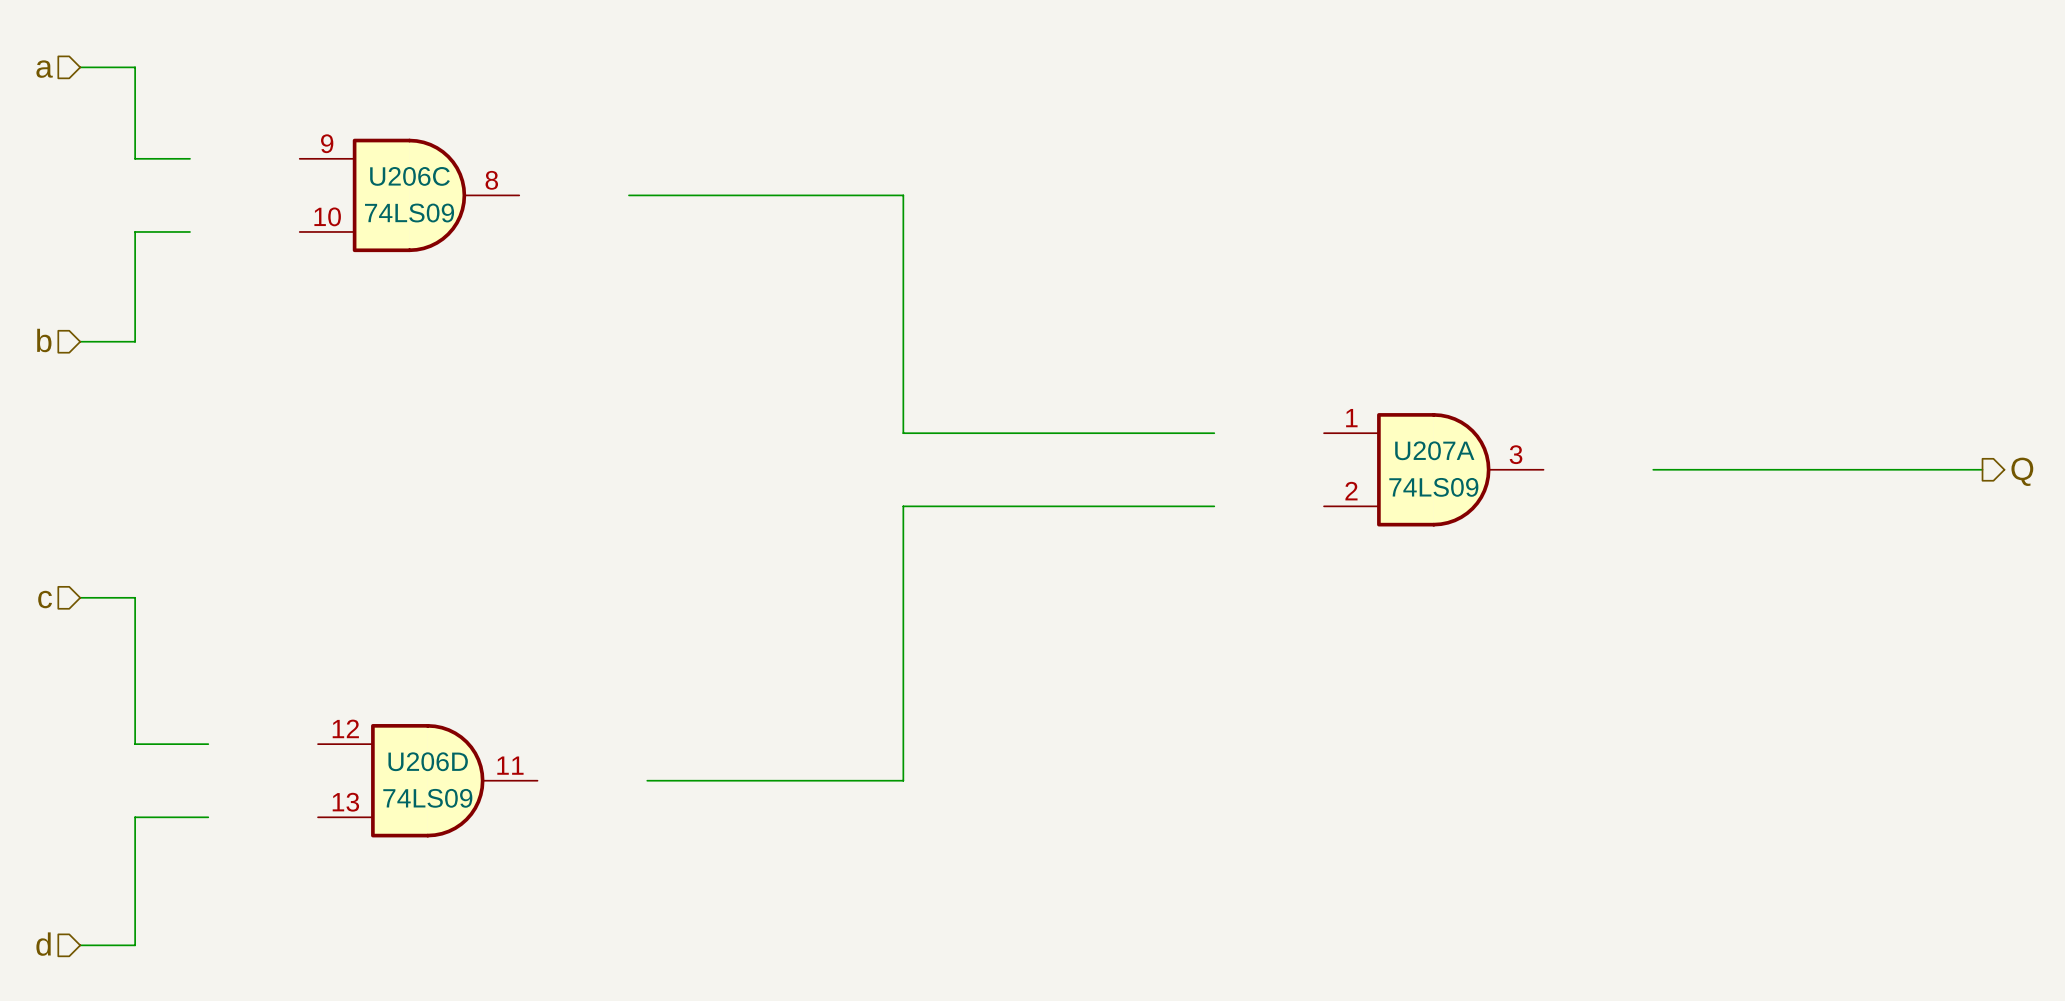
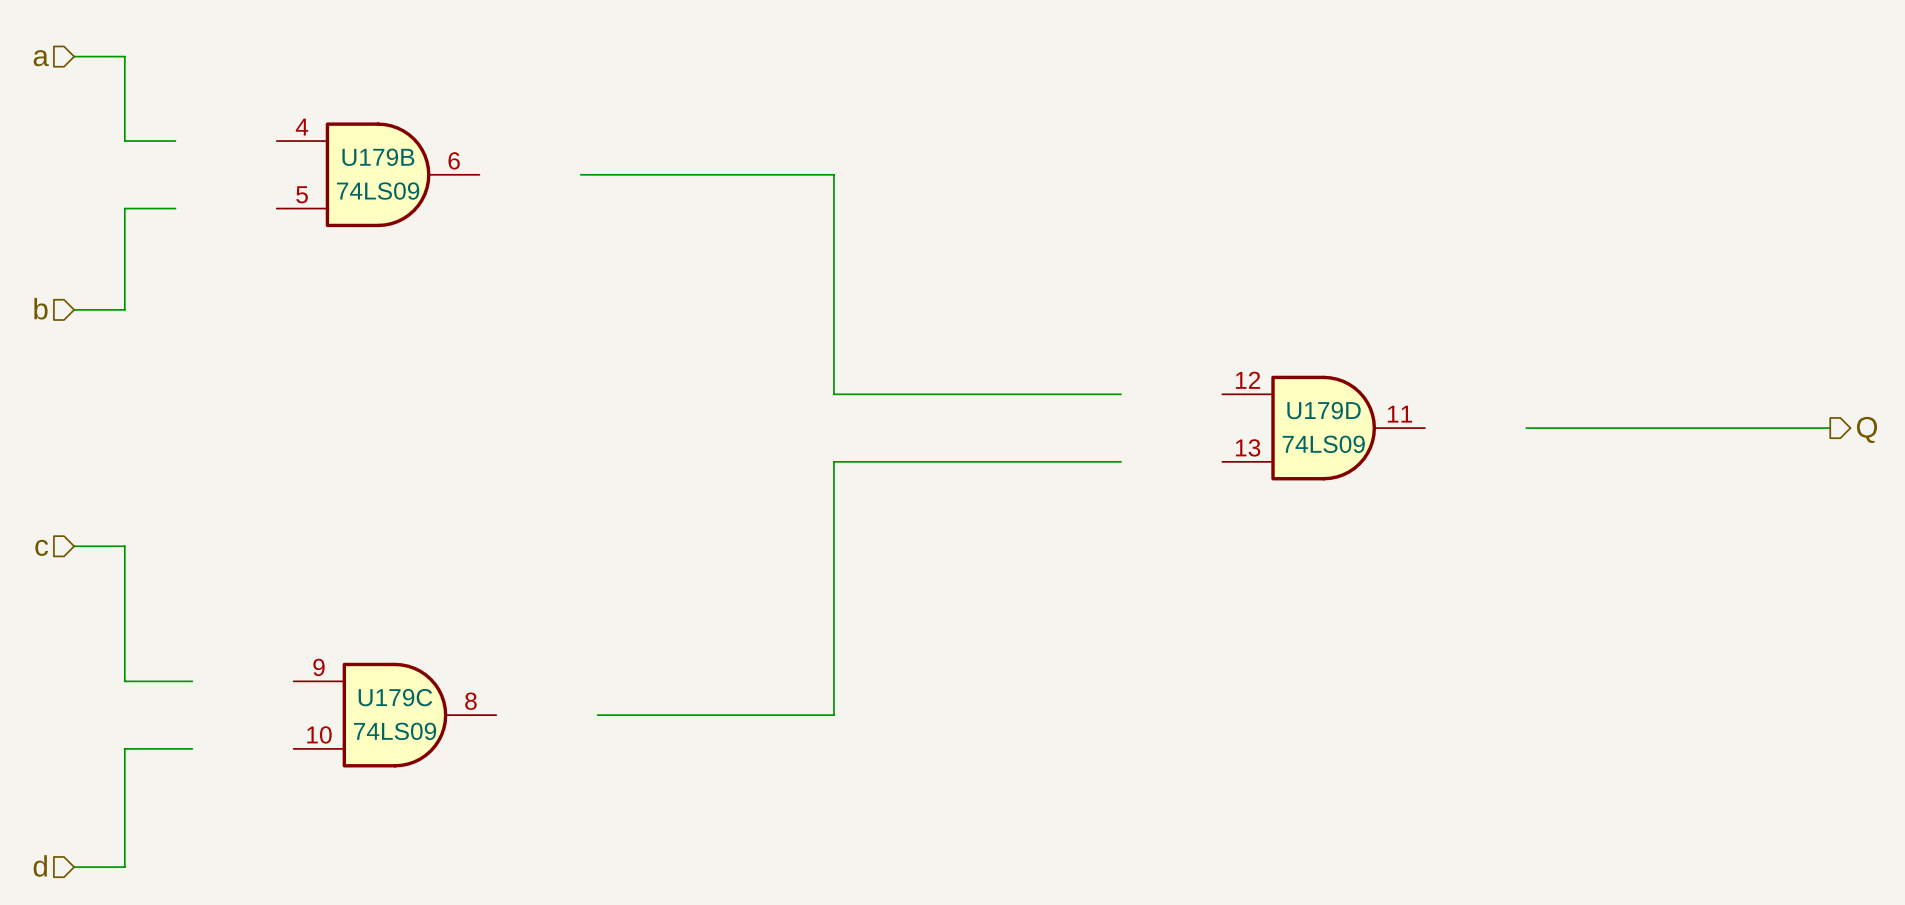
U206C pin number: 9 (327, 143) -> 4 (302, 127)
U206C name: U206C (410, 176) -> U179B (378, 157)
U206C pin number: 8 (491, 180) -> 6 (454, 160)
U206C pin number: 10 (327, 216) -> 5 (302, 194)
U207A pin number: 1 (1351, 418) -> 12 (1248, 380)
U207A name: U207A (1434, 450) -> U179D (1324, 410)
U207A pin number: 3 (1516, 454) -> 11 (1399, 414)
U207A pin number: 2 (1351, 491) -> 13 (1248, 447)
U206D pin number: 12 (345, 728) -> 9 (318, 667)
U206D name: U206D (428, 761) -> U179C (395, 697)
U206D pin number: 11 (510, 765) -> 8 (470, 701)
U206D pin number: 13 (345, 802) -> 10 (319, 734)

